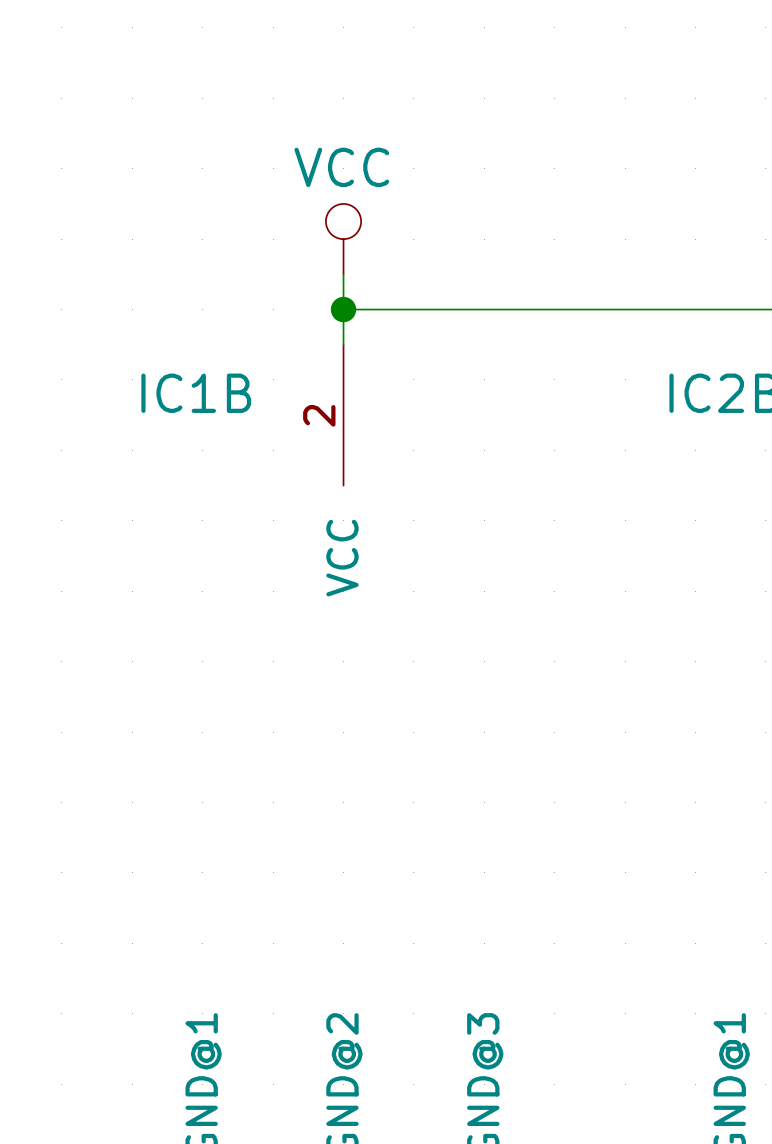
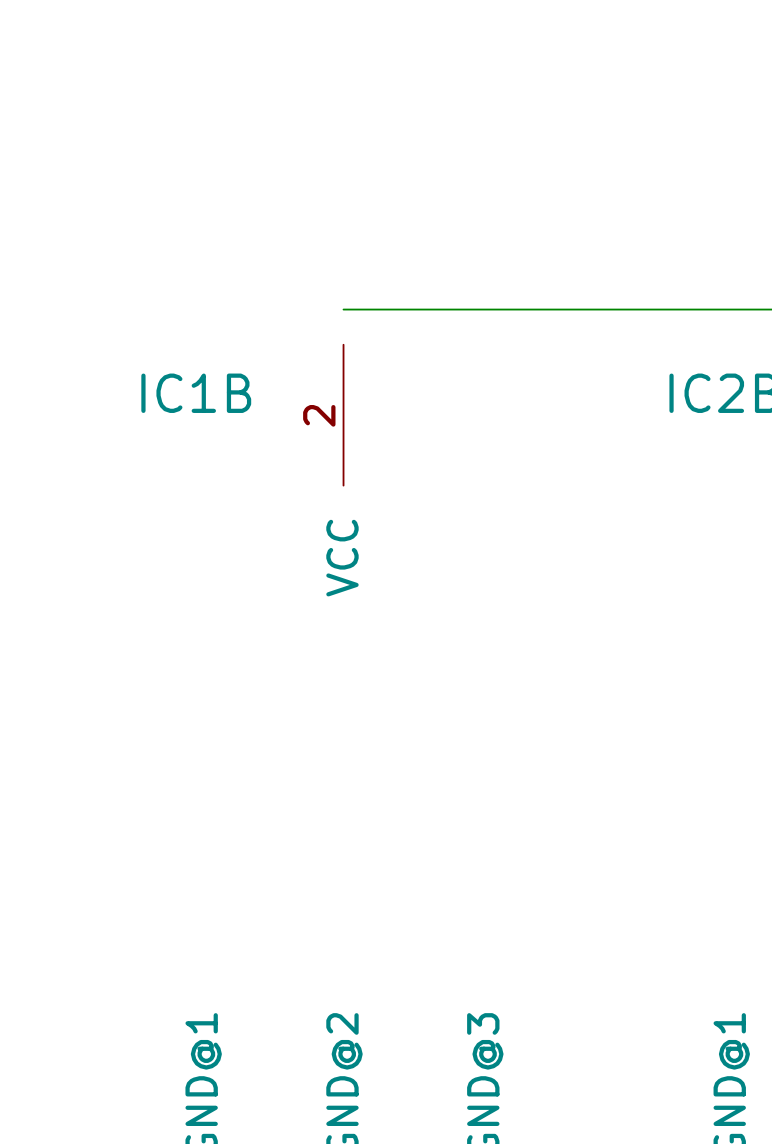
power symbol: VCC (343, 239) -> none
wire: (343, 274) (343, 344) -> none
junction: (343, 309) -> none

